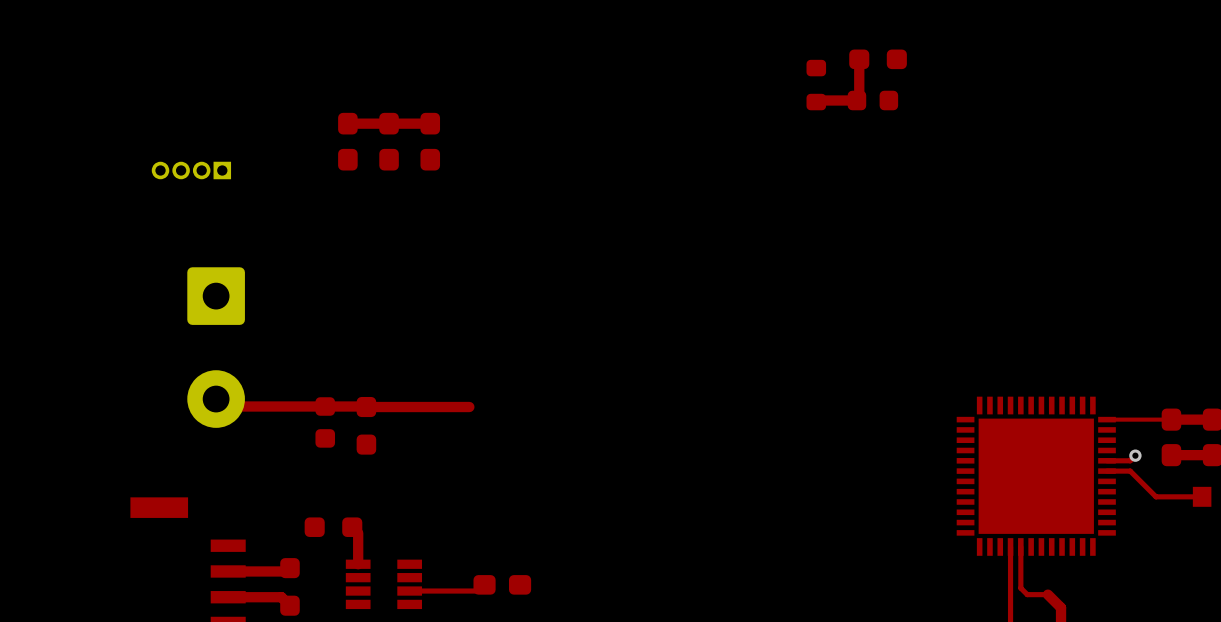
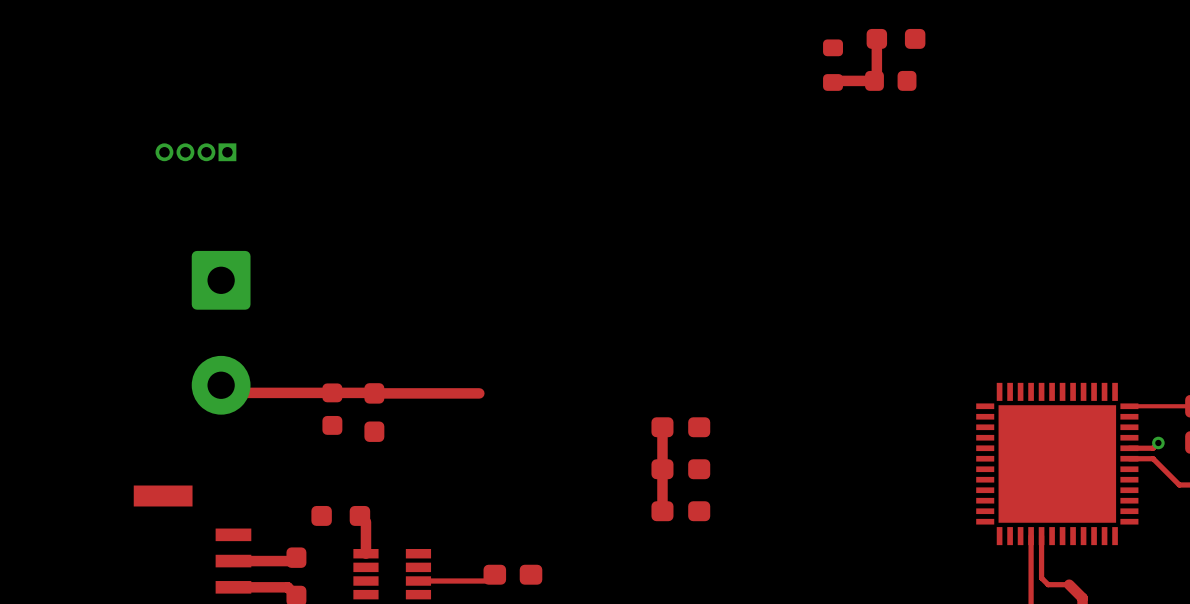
top track: (430, 123) (347, 123) -> none
part: (347, 141) -> none
part: (389, 141) -> none
part: (430, 141) -> none
top track: none -> (662, 427) (662, 511)
part: none -> (680, 427)
part: none -> (680, 469)
part: none -> (680, 511)

